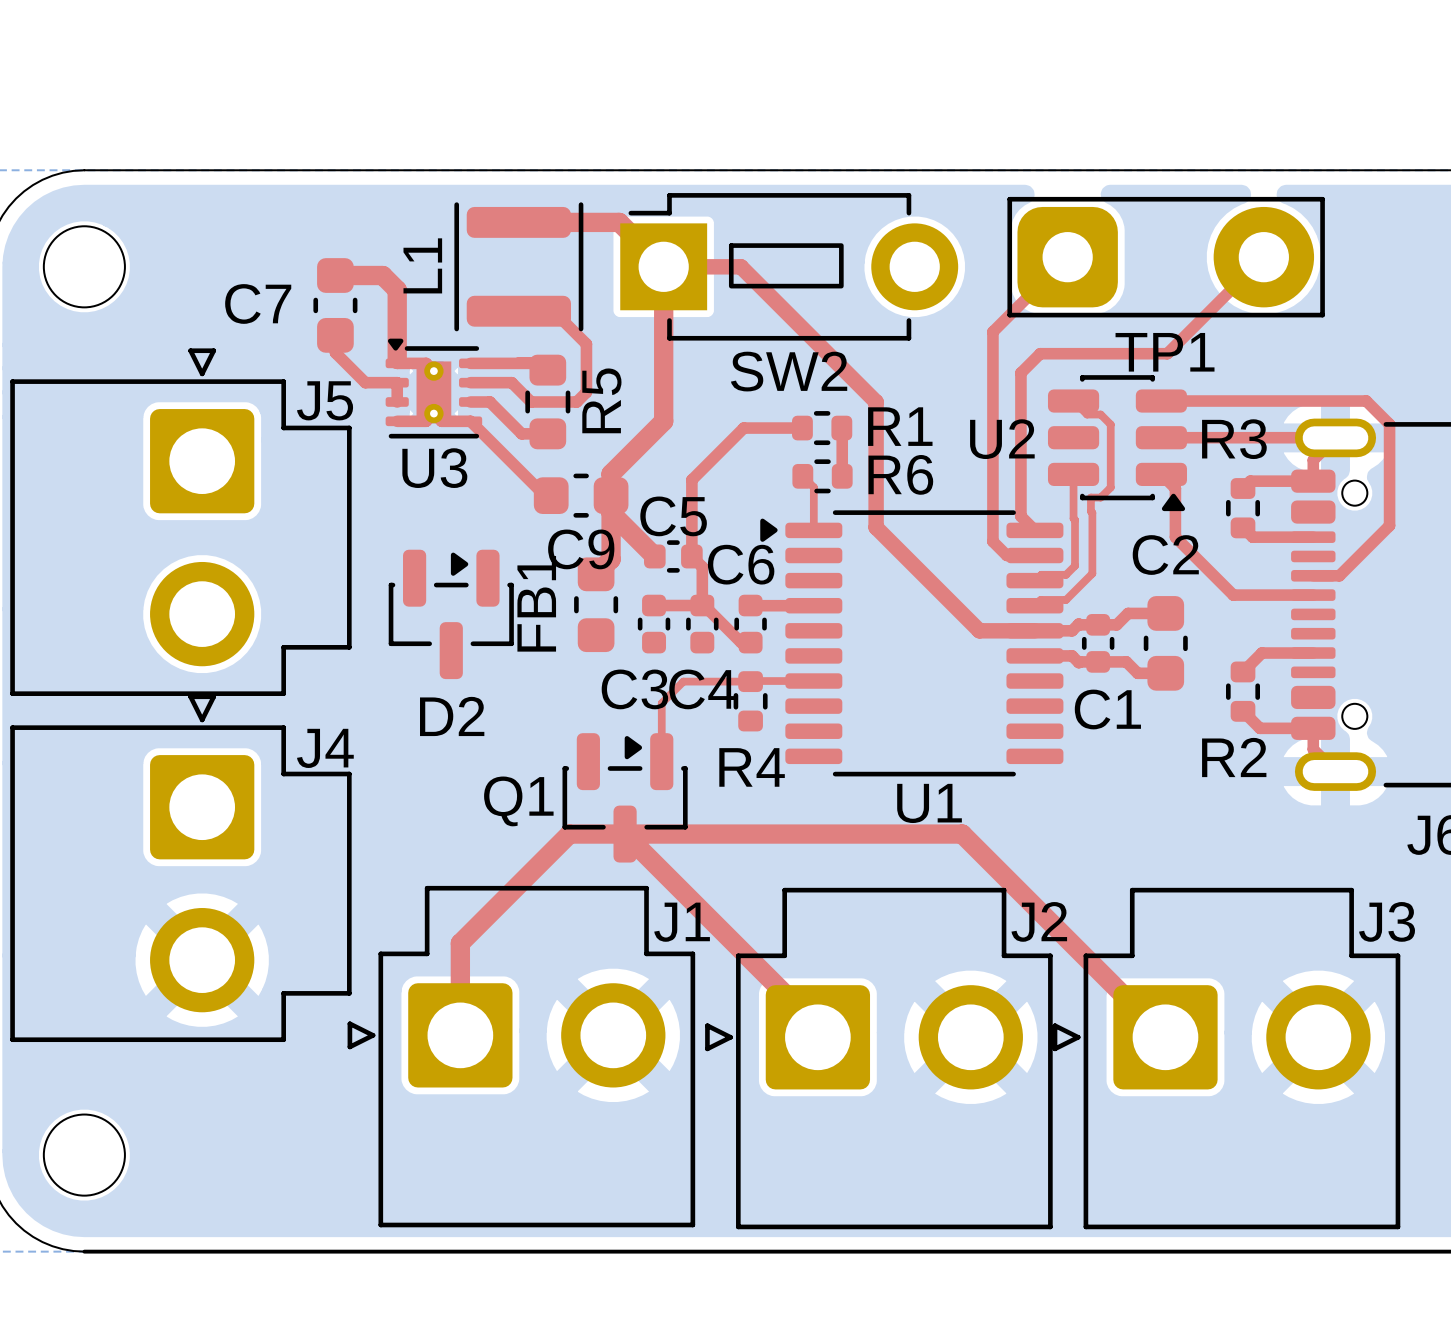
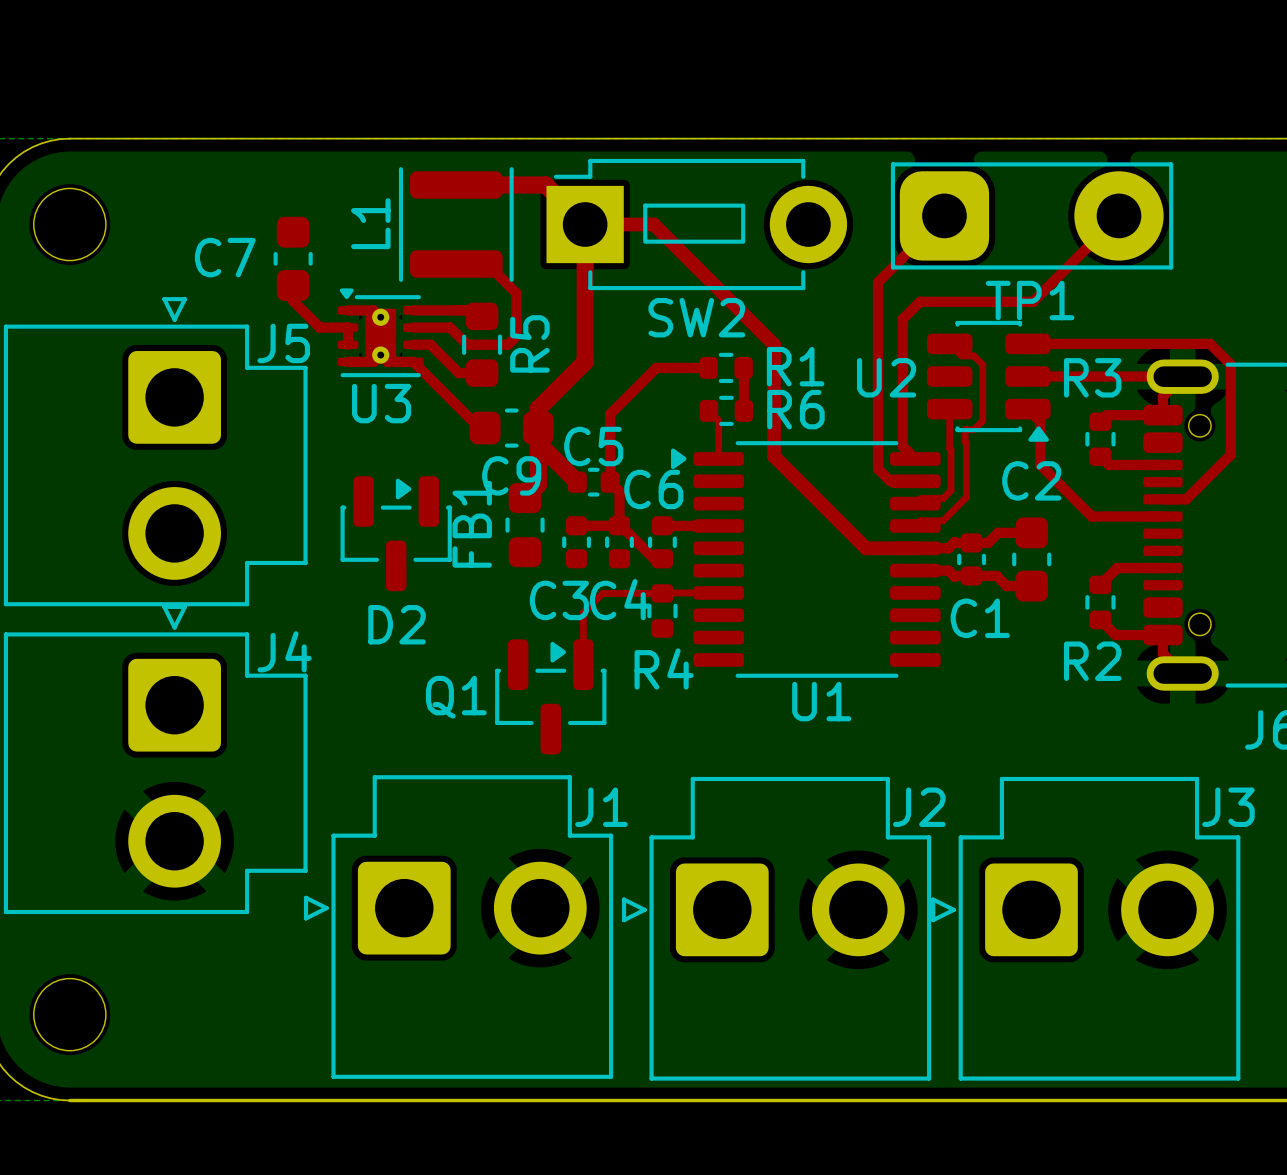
top track: (335, 275) (382, 275) (397, 289) (397, 359) -> none
top track: (625, 834) (817, 1026) (817, 1037) -> none
top track: (460, 1035) (460, 943) (569, 834) (962, 834) (1165, 1037) -> none

